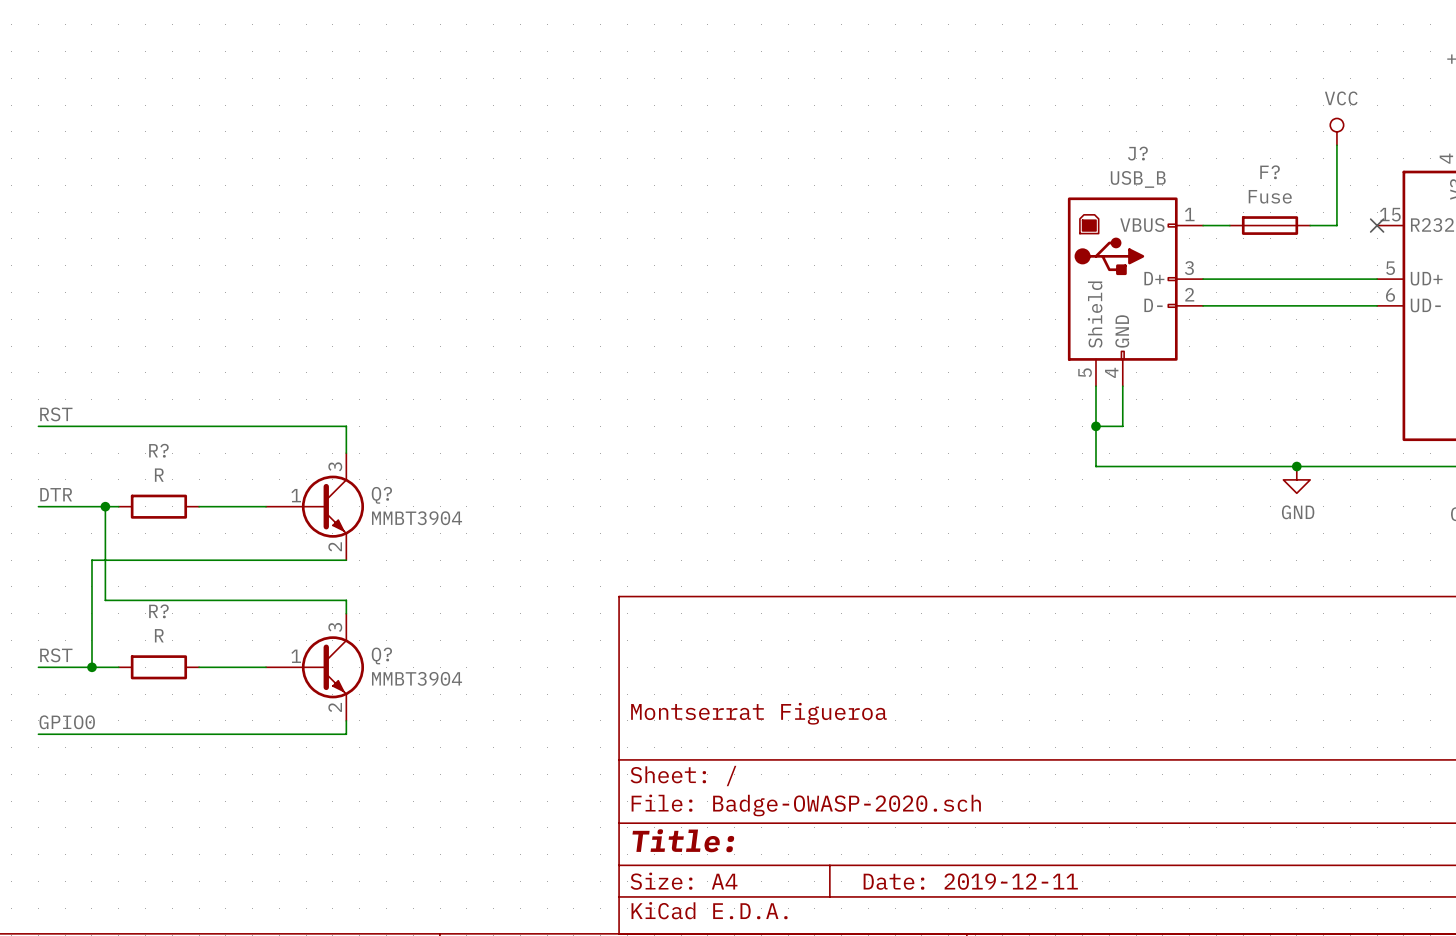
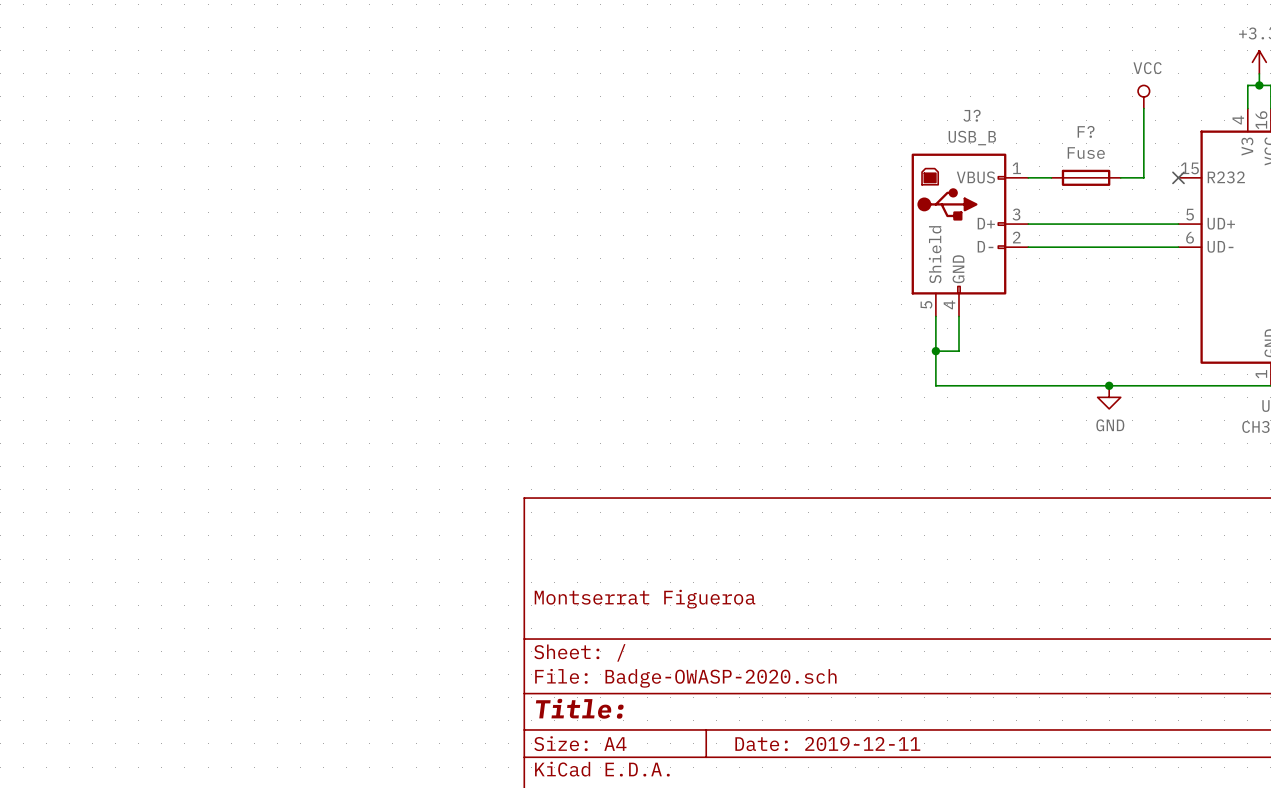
label: RST (56, 414) -> none
wire: (38, 426) (346, 426) (346, 453) -> none
label: DTR (56, 494) -> none
wire: (38, 506) (118, 506) -> none
wire: (105, 506) (105, 600) (346, 600) (346, 613) -> none
junction: (105, 506) -> none
R?: R (158, 506) -> none
wire: (199, 506) (266, 506) -> none
Q?: MMBT3904 (315, 506) -> none
wire: (346, 560) (91, 560) (91, 667) -> none
label: RST (56, 655) -> none
wire: (38, 667) (118, 667) -> none
junction: (91, 667) -> none
R?: R (158, 667) -> none
wire: (199, 667) (266, 667) -> none
Q?: MMBT3904 (315, 667) -> none
wire: (346, 720) (346, 734) (38, 734) -> none
label: GPIO0 (67, 722) -> none

